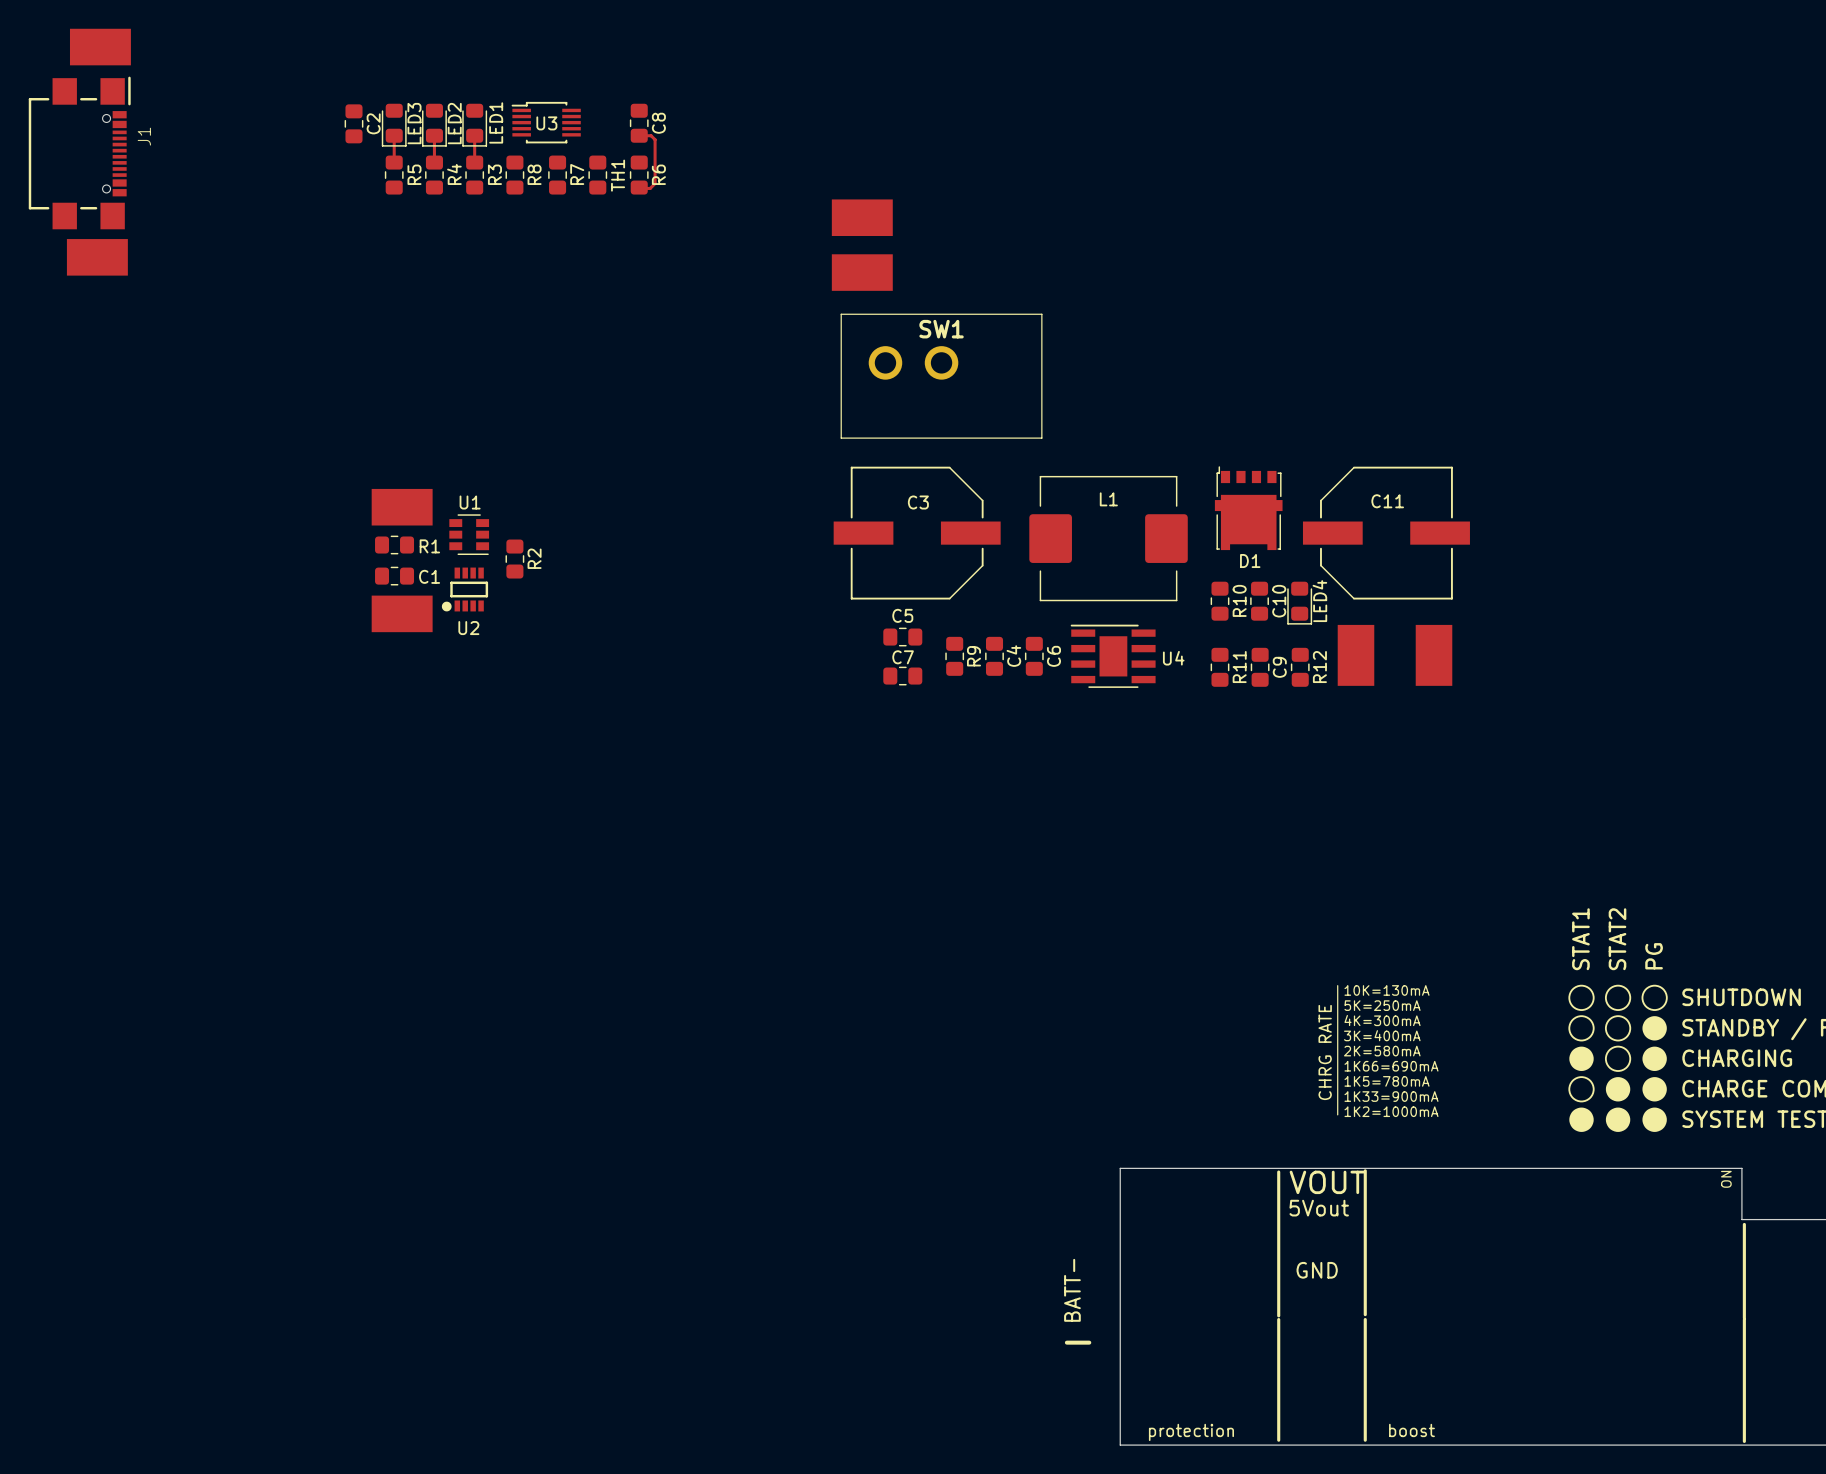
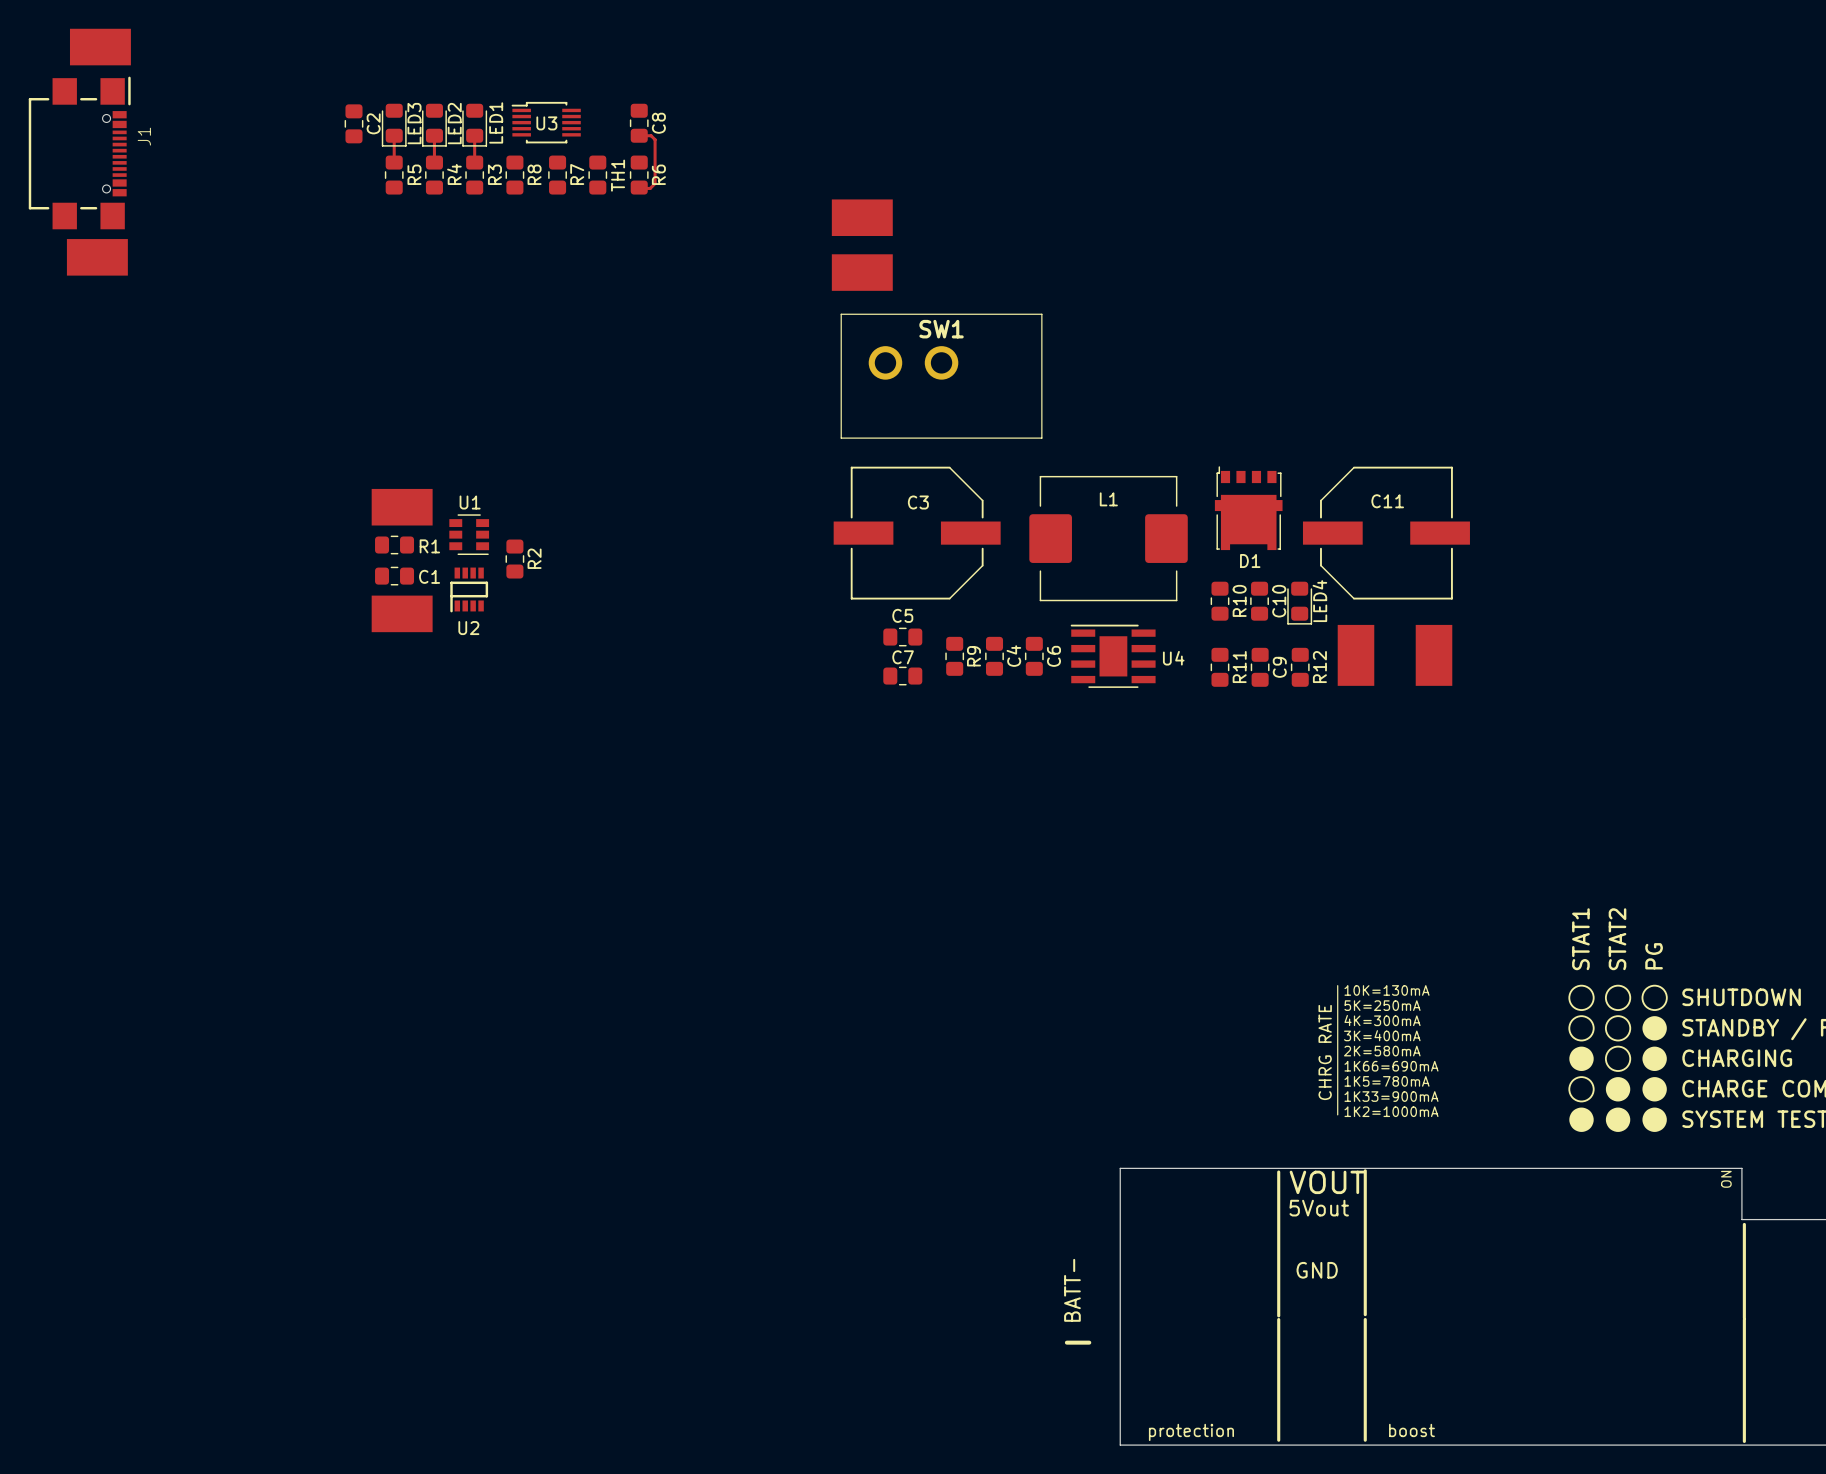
U2 footprint: [441, 567, 489, 612] -> [450, 567, 489, 613]

